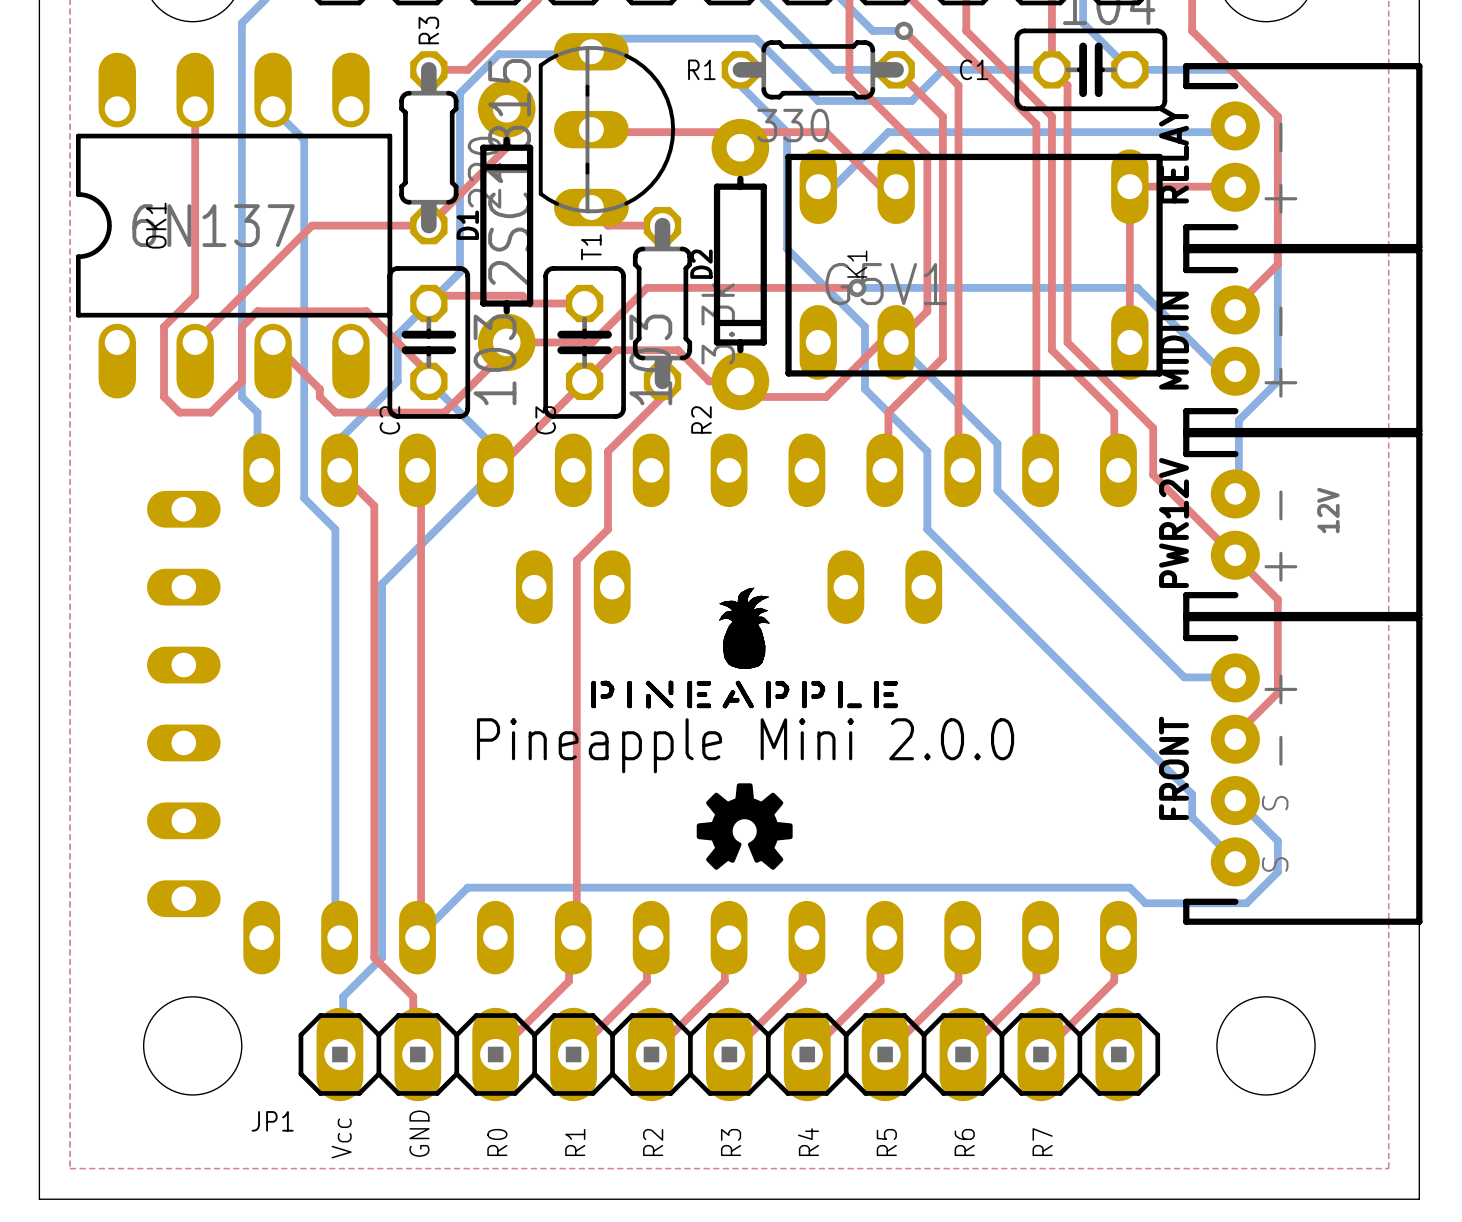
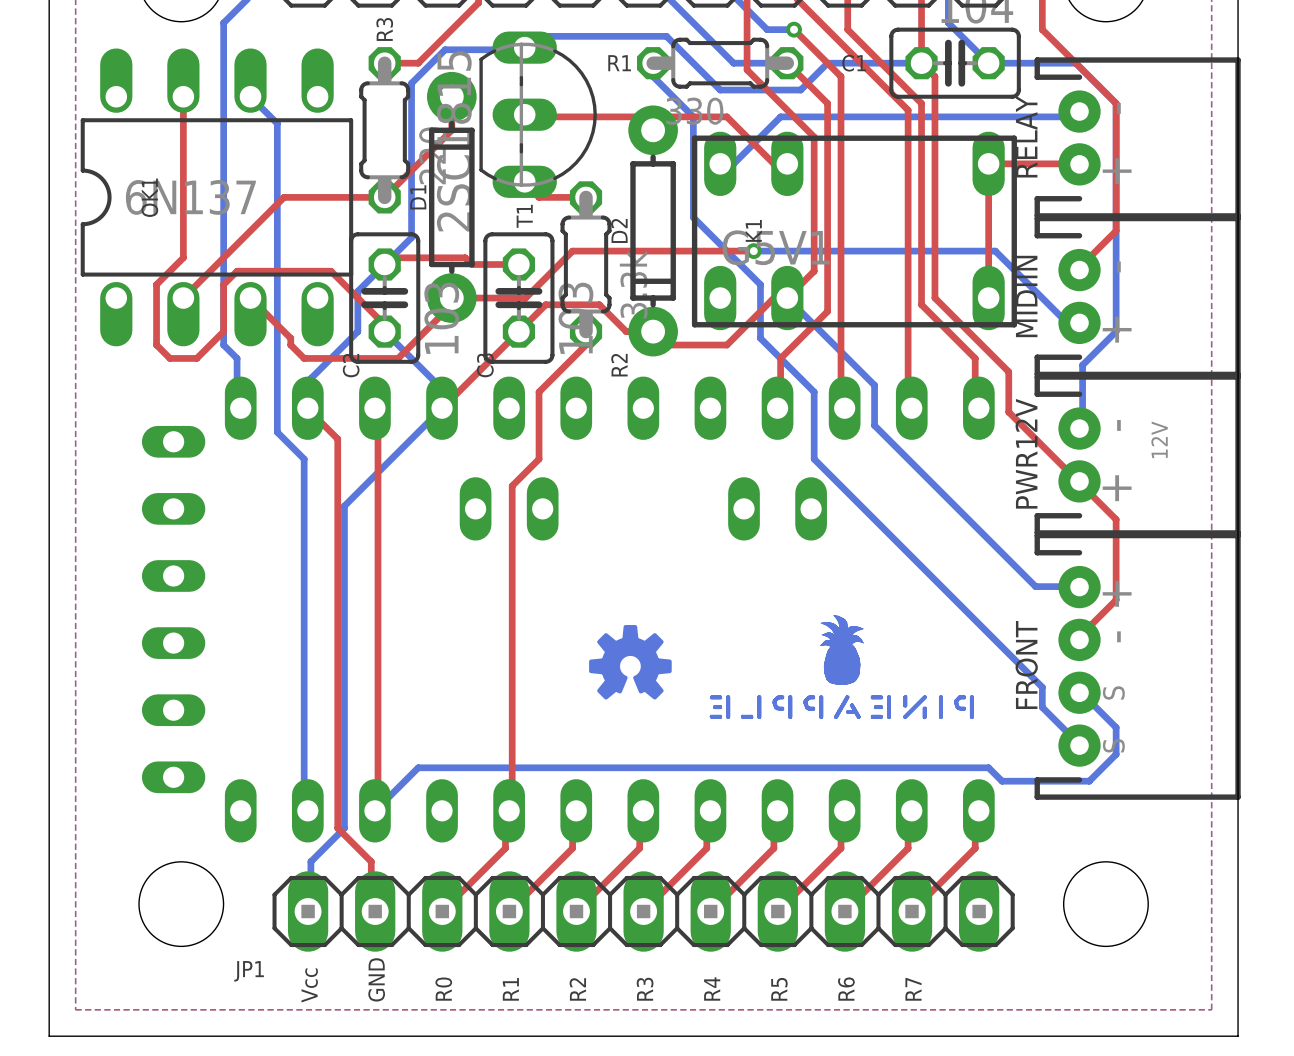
drawing: [591, 587, 899, 709] -> none
drawing: none -> [709, 614, 974, 720]
drawing: none -> [589, 625, 672, 700]
text: Pineapple Mini 2.0.0 (745, 745) -> none
drawing: [696, 783, 793, 870] -> none

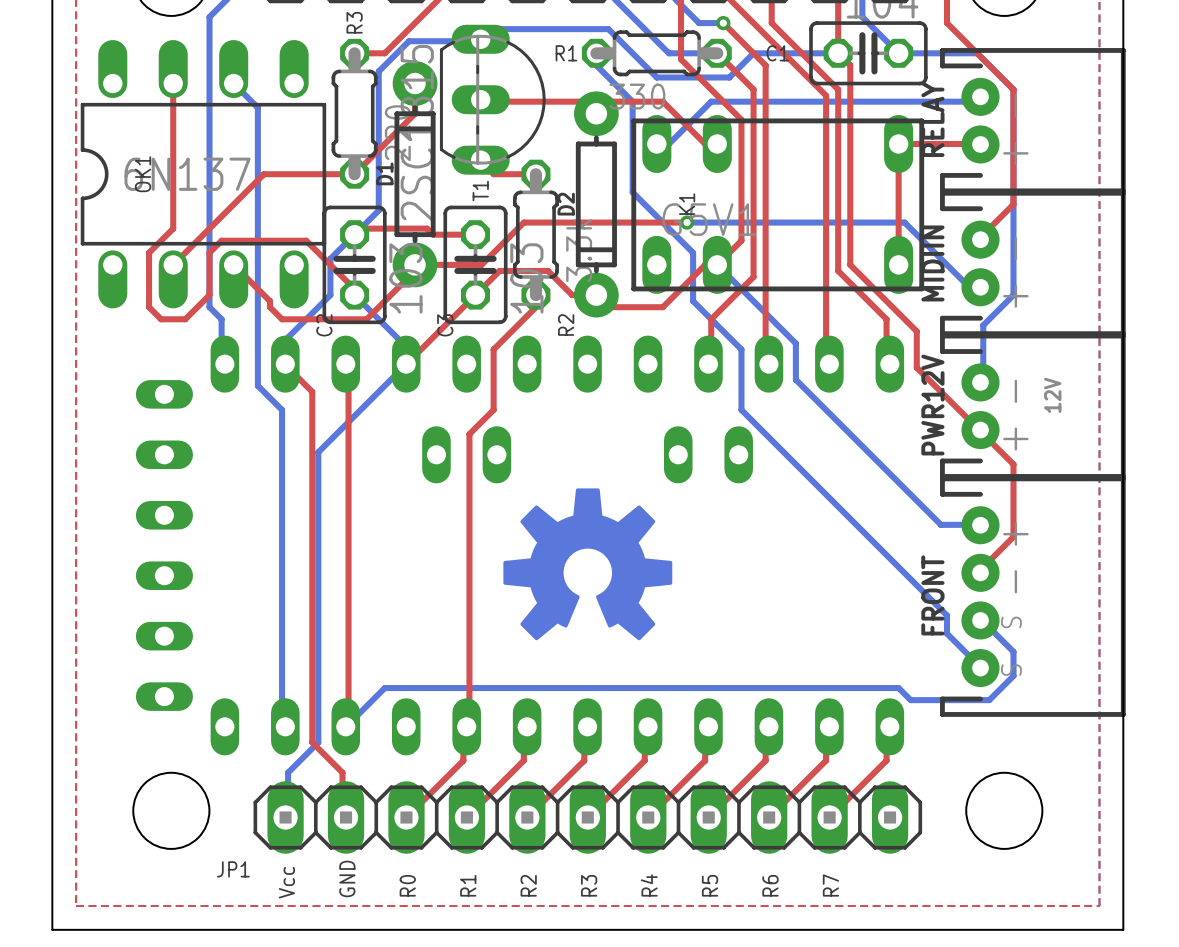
drawing: none -> [503, 488, 673, 641]
drawing: [709, 614, 974, 720] -> none
drawing: [589, 625, 672, 700] -> none

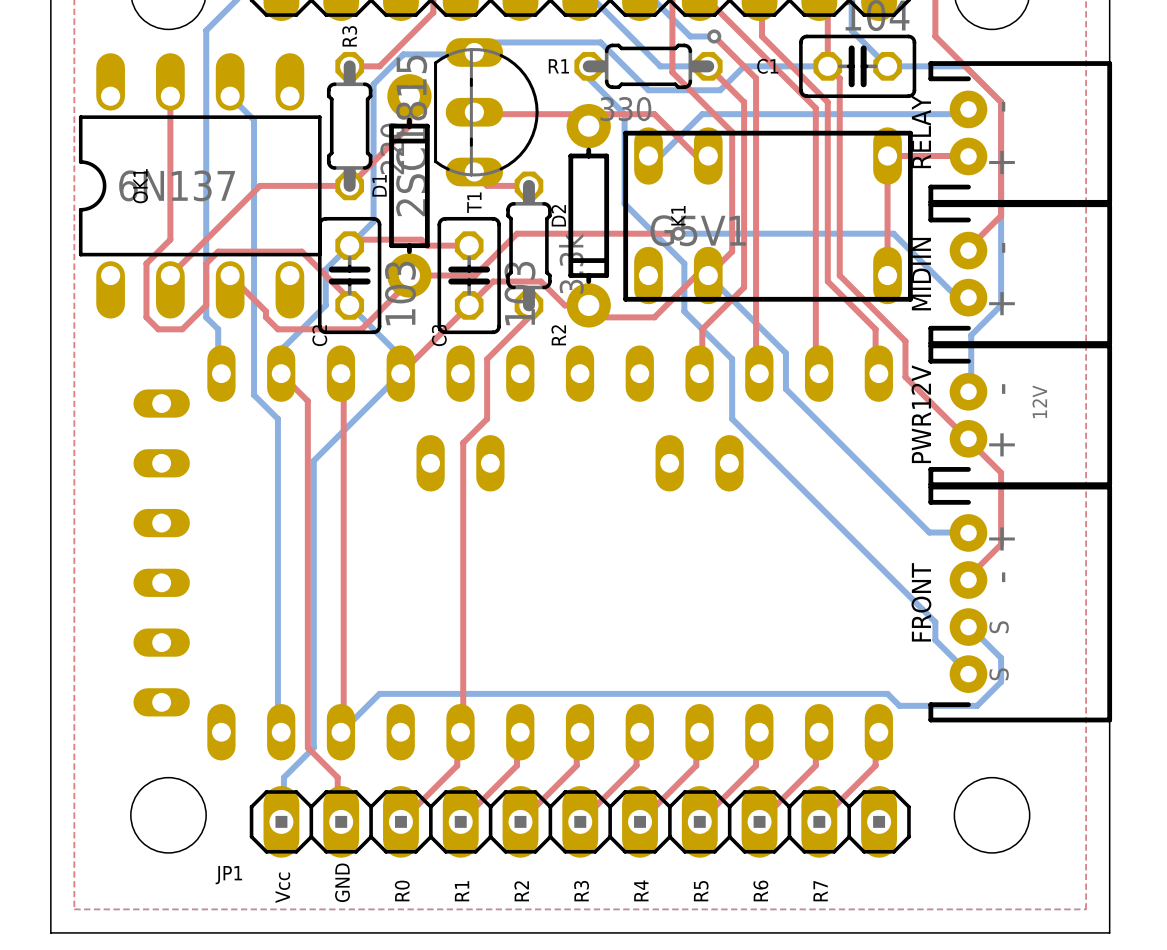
drawing: [503, 488, 673, 641] -> none

